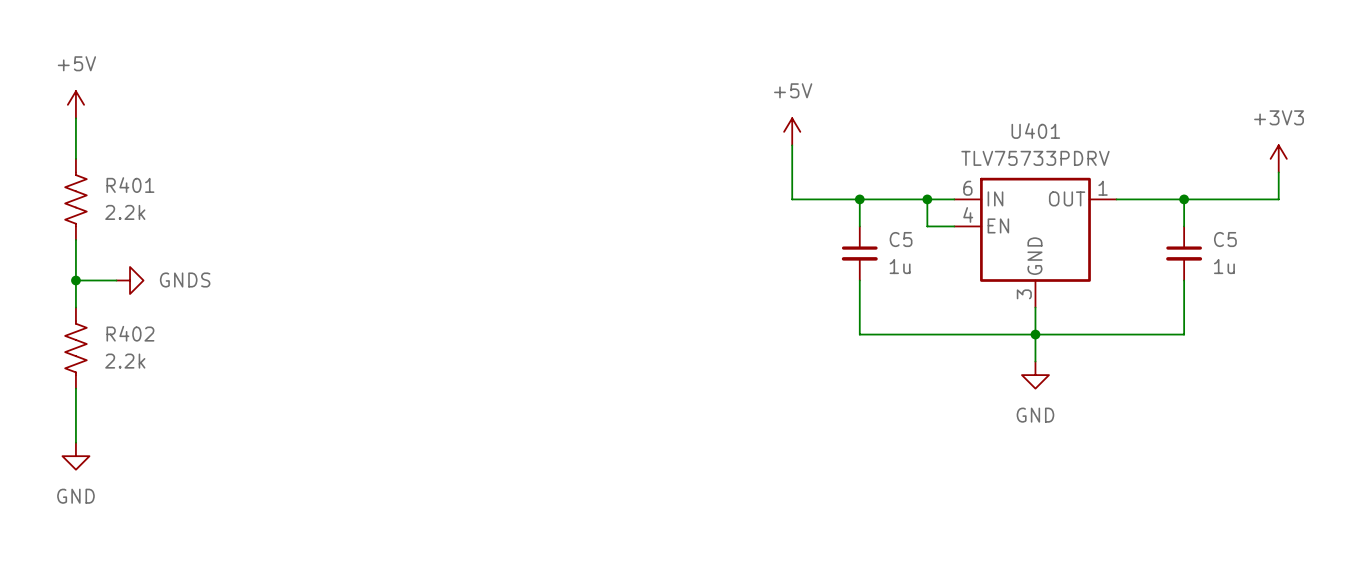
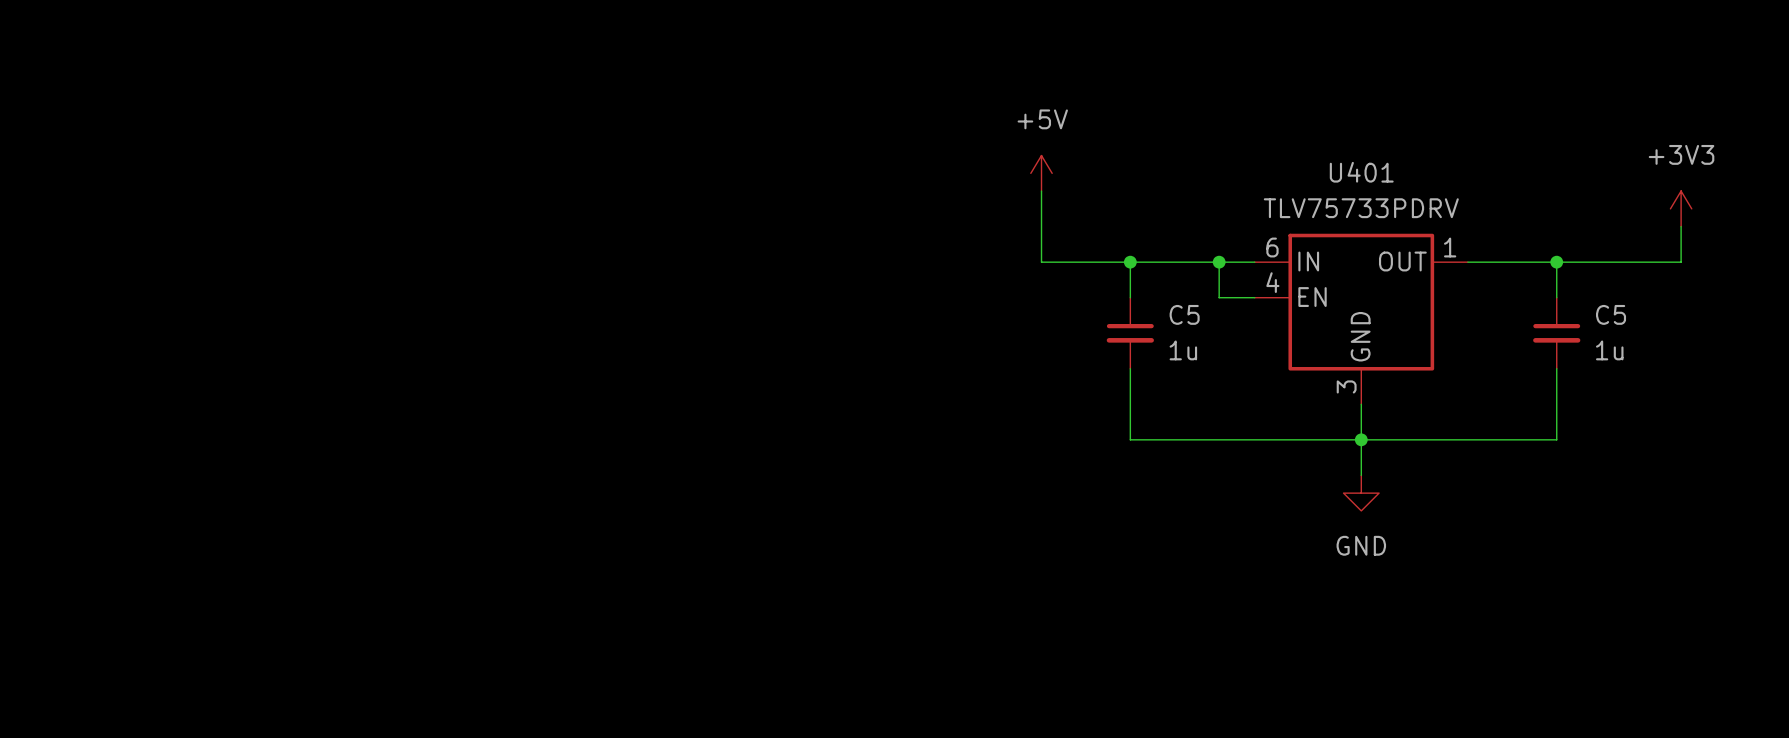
power symbol: +5V (75, 104) -> none
wire: (75, 118) (75, 158) -> none
R401: 2.2k (75, 199) -> none
wire: (75, 239) (75, 307) -> none
wire: (75, 280) (116, 280) -> none
junction: (75, 280) -> none
power symbol: GNDS (130, 280) -> none
R402: 2.2k (75, 348) -> none
wire: (75, 388) (75, 442) -> none
power symbol: GND (75, 456) -> none

